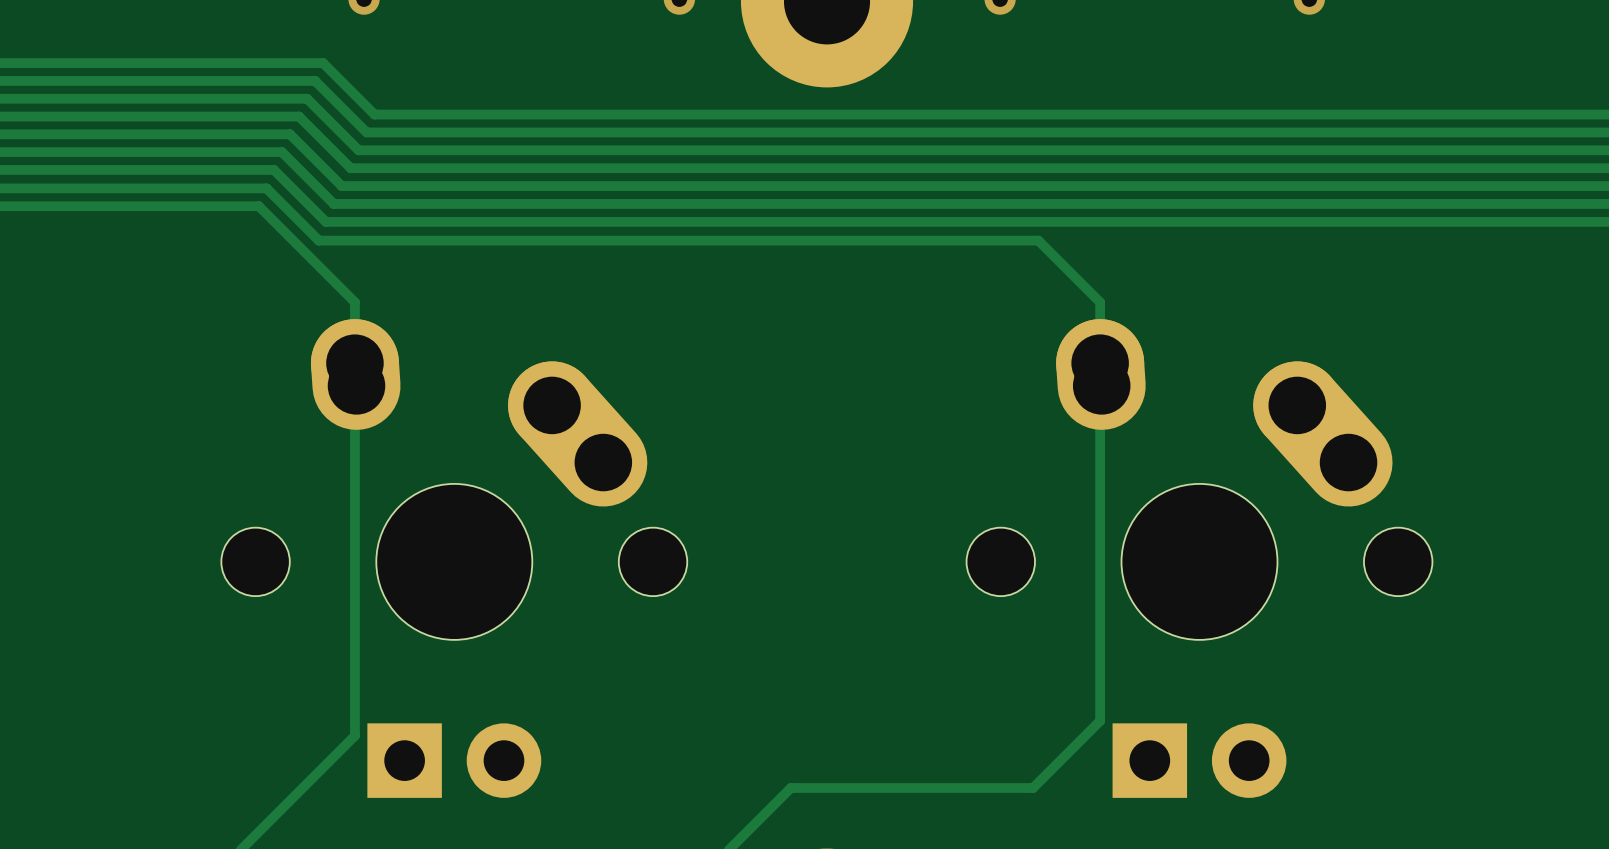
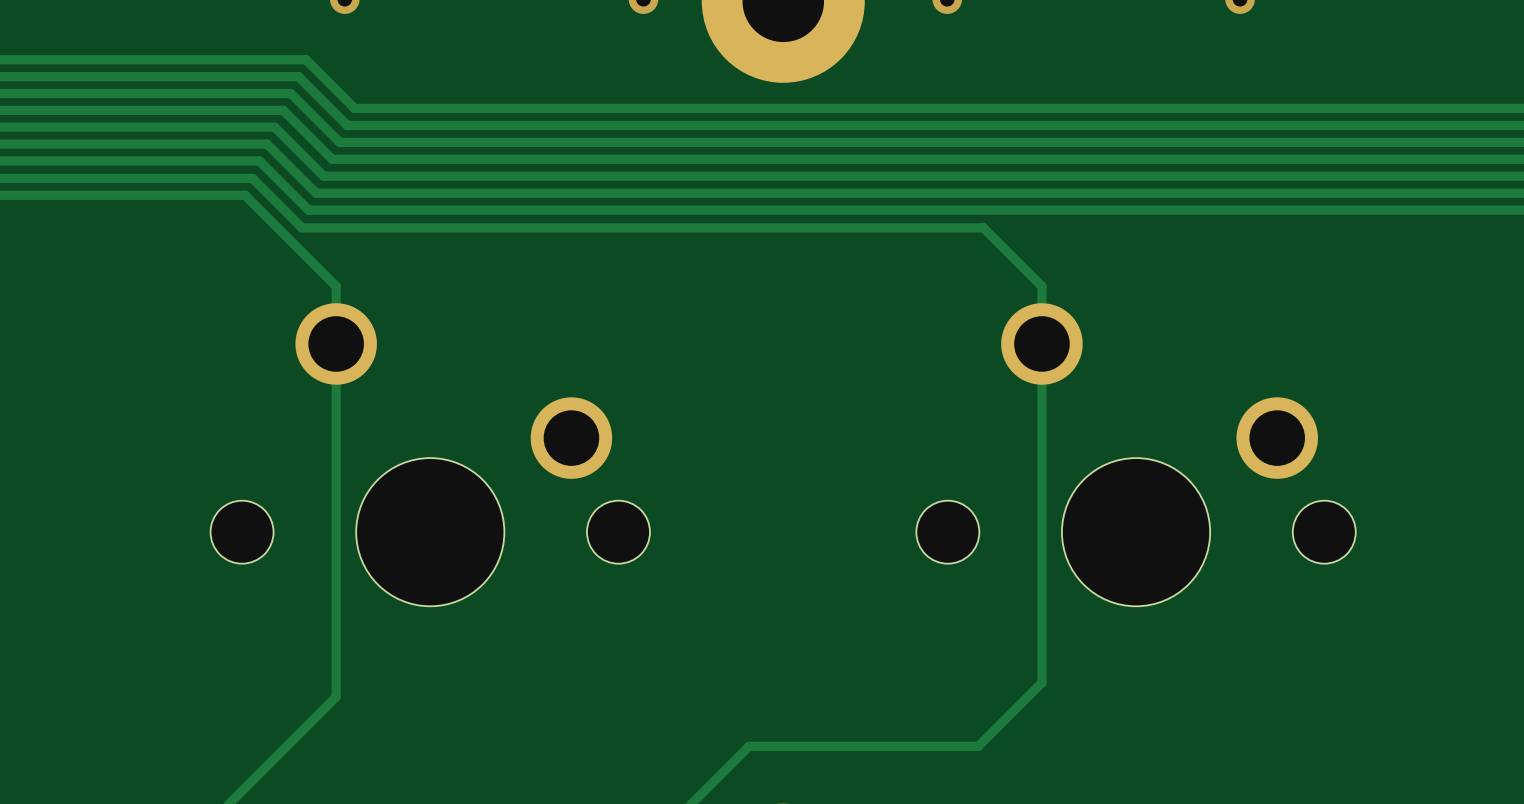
part: none -> (430, 454)
part: none -> (1136, 454)
part: (454, 558) -> none
part: (1199, 558) -> none

